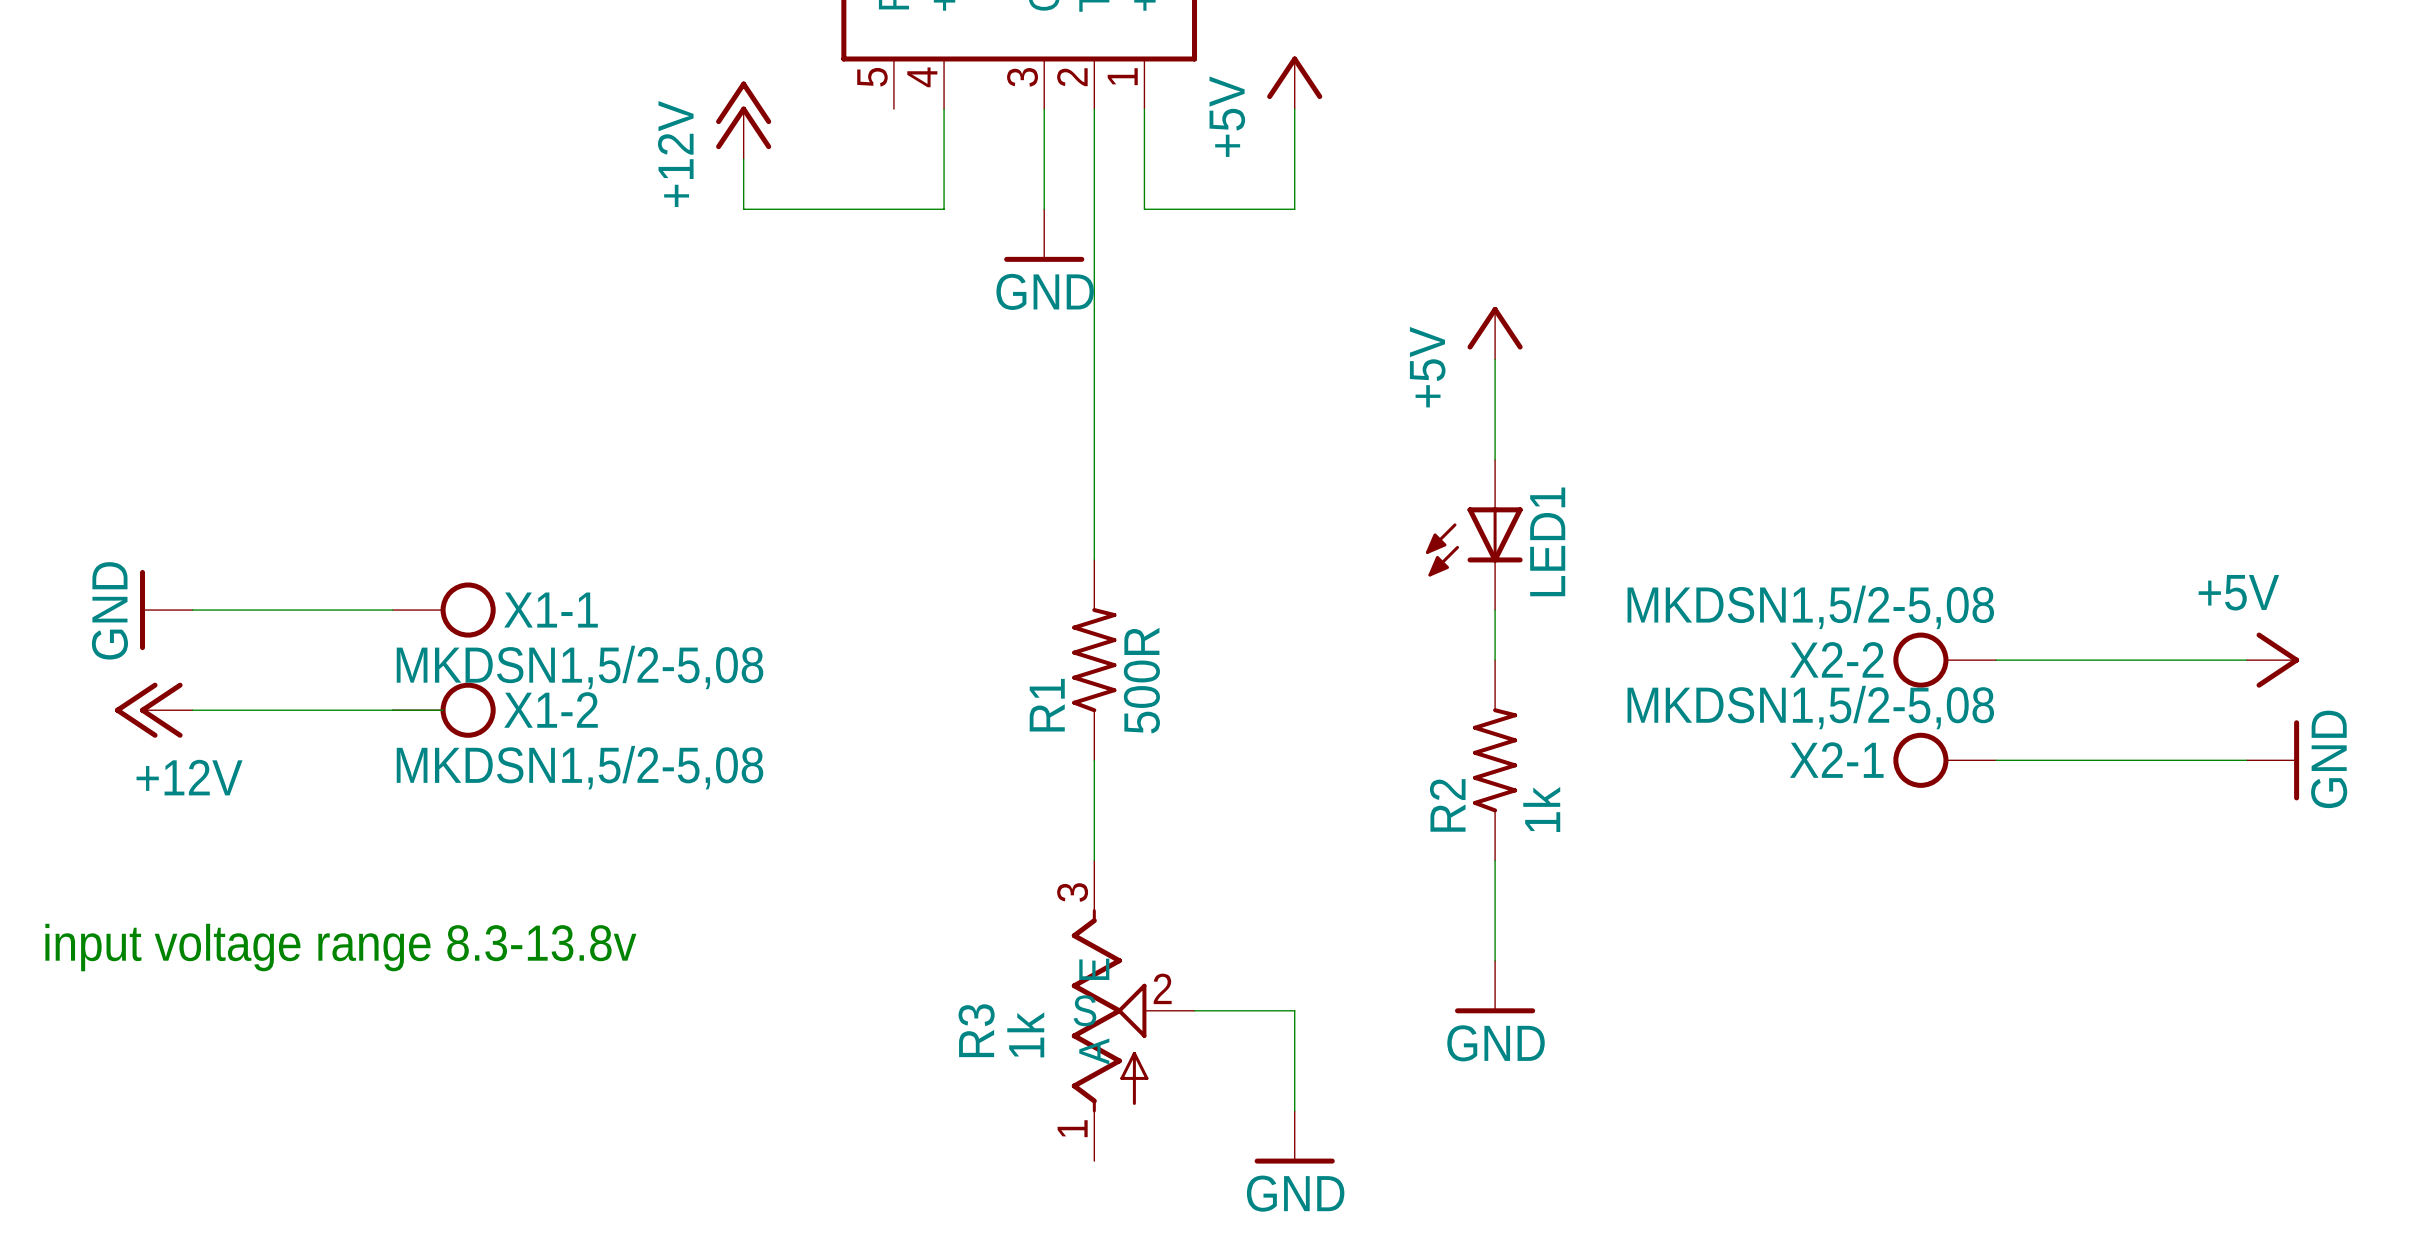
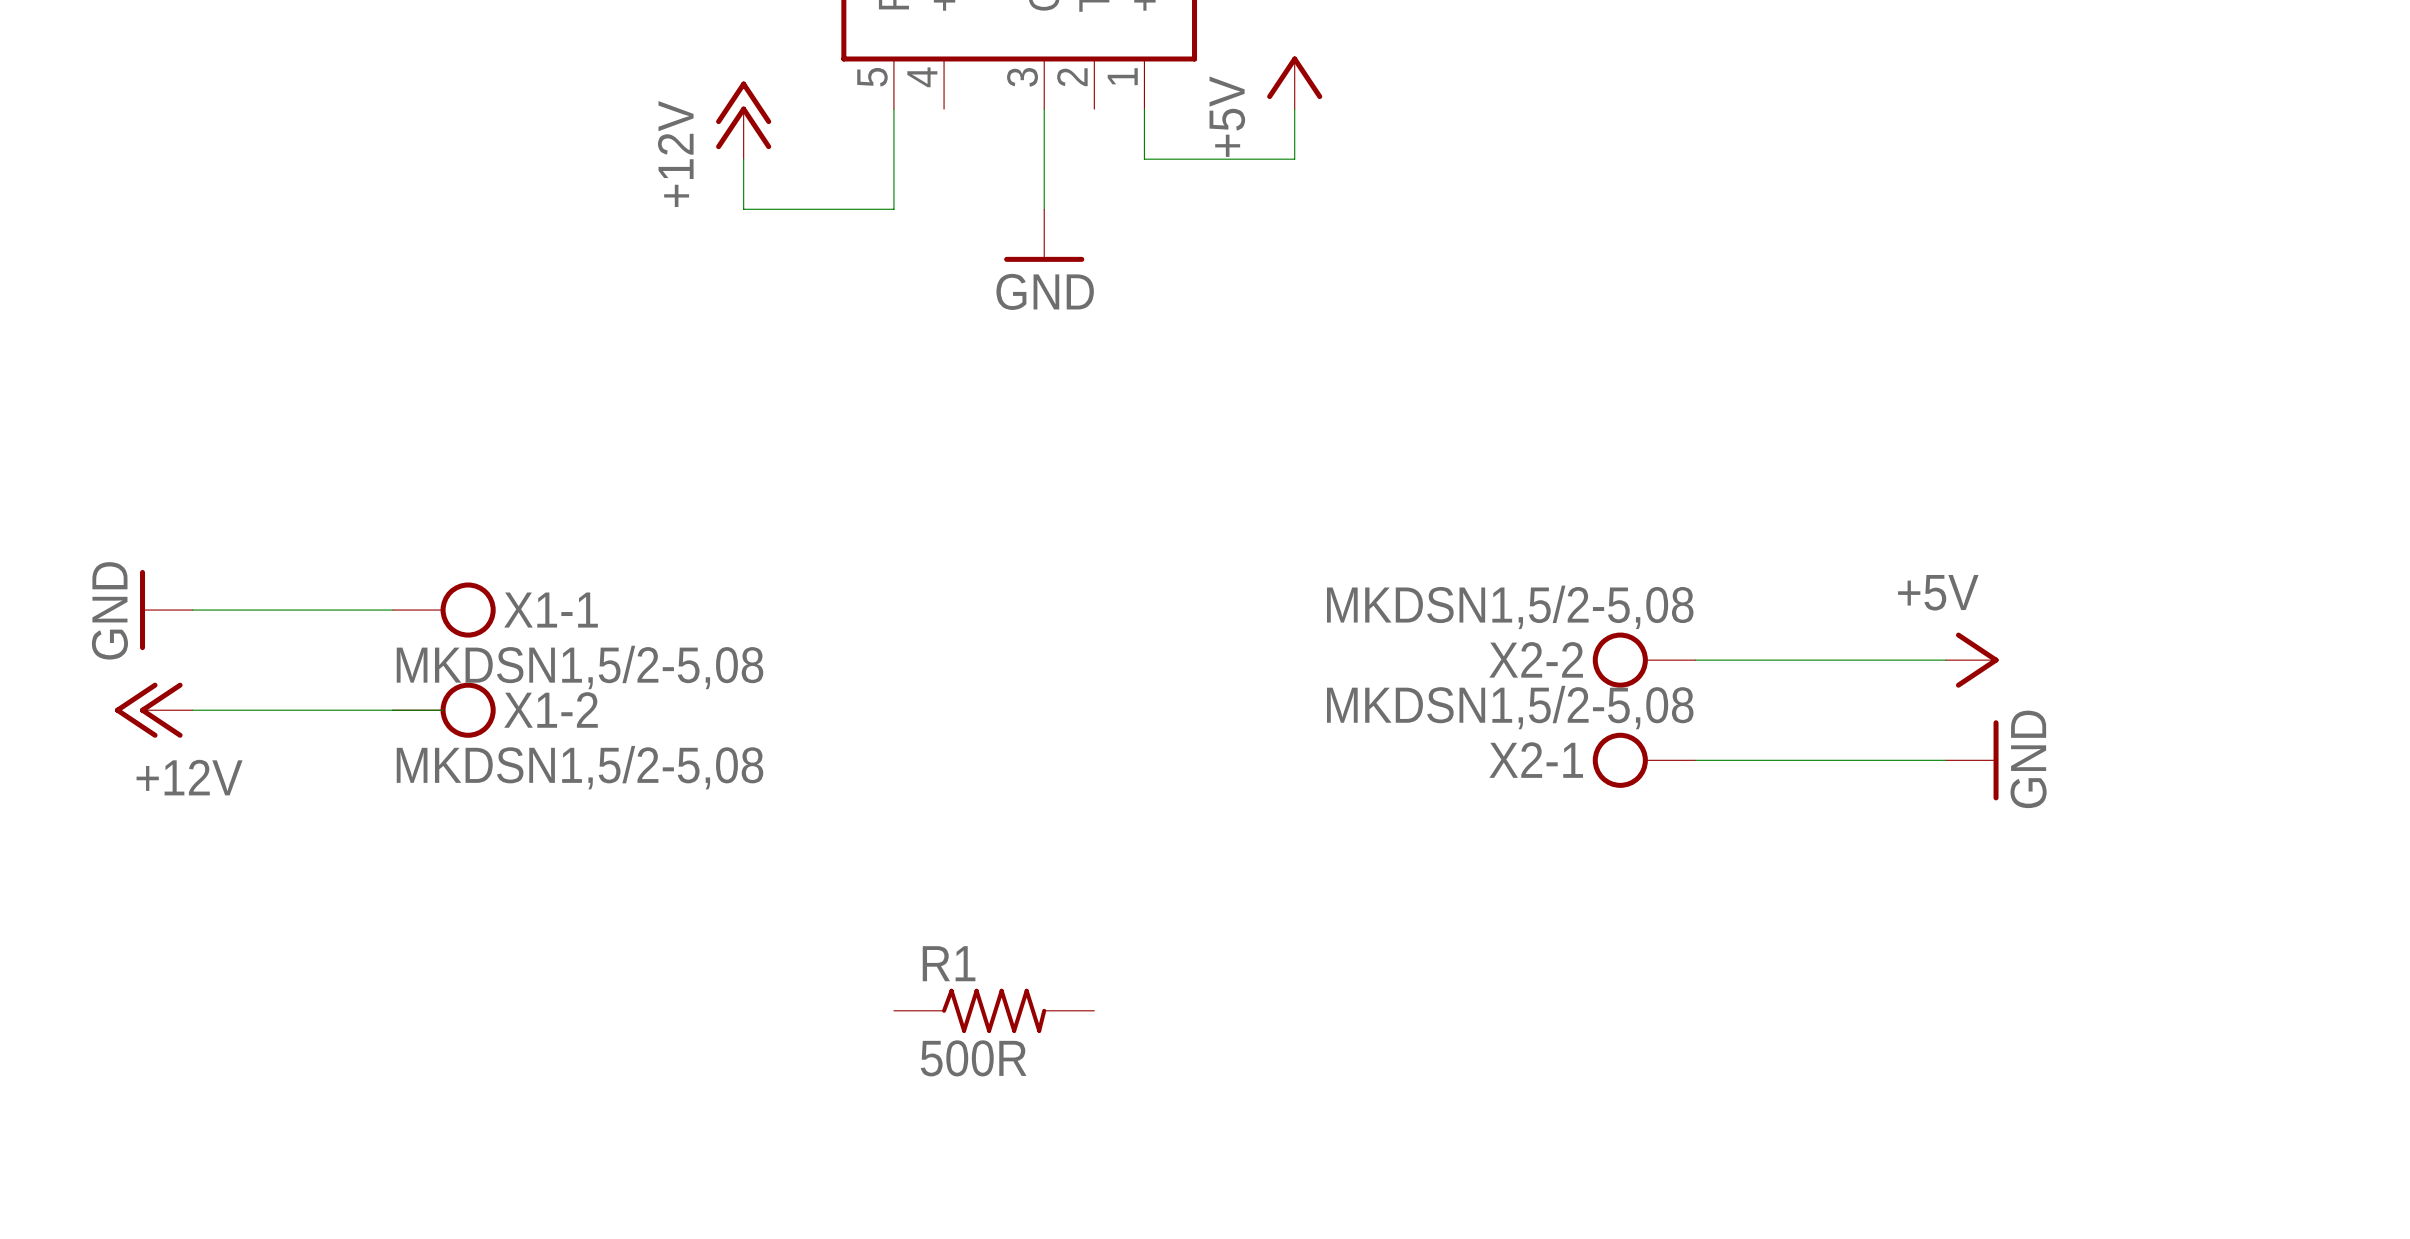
wire: (944, 109) (944, 209) (893, 209) -> (893, 109) (893, 209)
wire: (1094, 109) (1094, 559) -> none
wire: (1144, 159) (1144, 209) (1294, 209) (1294, 159) -> (1144, 159) (1294, 159)
power symbol: +5V (1495, 333) -> none
wire: (1495, 359) (1495, 459) -> none
LED1: (1474, 534) -> none
wire: (1495, 610) (1495, 660) -> none
R1 rotation: 0° (1094, 660) -> 90° clockwise (994, 1010)
R1 position: (1094, 660) -> (994, 1010)
X2-2 position: (1944, 660) -> (1644, 660)
power symbol: none -> +5V (1972, 660)
wire: (1996, 660) (2246, 660) -> (1695, 660) (1945, 660)
power symbol: +5V (2272, 660) -> none
wire: (1094, 760) (1094, 860) -> none
R2: 1k (1495, 760) -> none
X2-1 position: (1944, 760) -> (1644, 760)
power symbol: none -> GND (1972, 760)
wire: (1996, 760) (2246, 760) -> (1695, 760) (1945, 760)
power symbol: GND (2272, 760) -> none
wire: (1495, 860) (1495, 960) -> none
text: input voltage range 8.3-13.8v (340, 947) -> none
power symbol: GND (1495, 987) -> none
R3: 1k (1133, 1010) -> none
wire: (1194, 1010) (1294, 1010) (1294, 1110) -> none
power symbol: GND (1294, 1137) -> none

